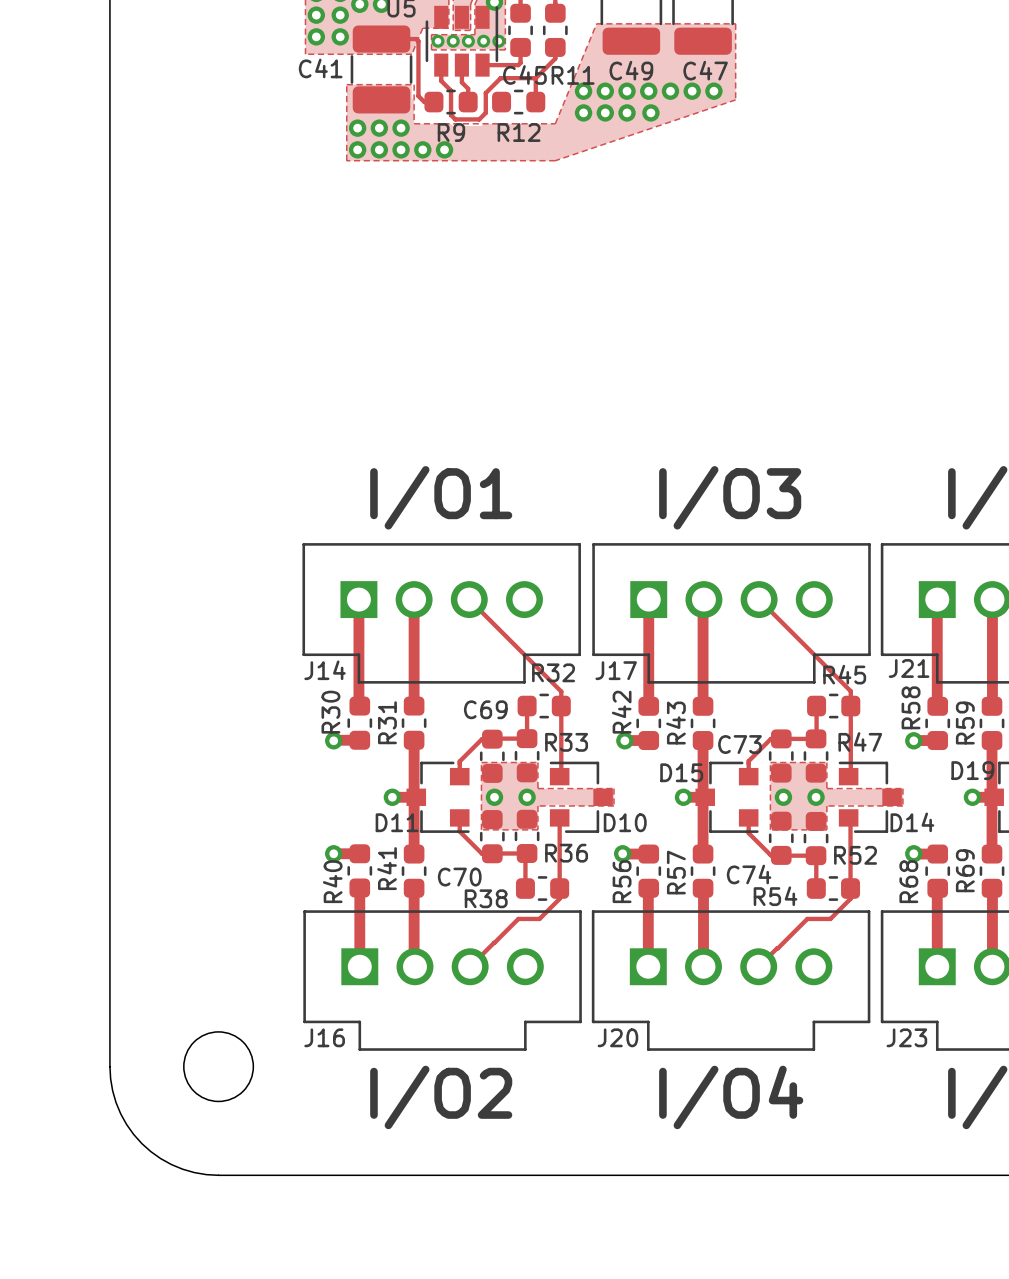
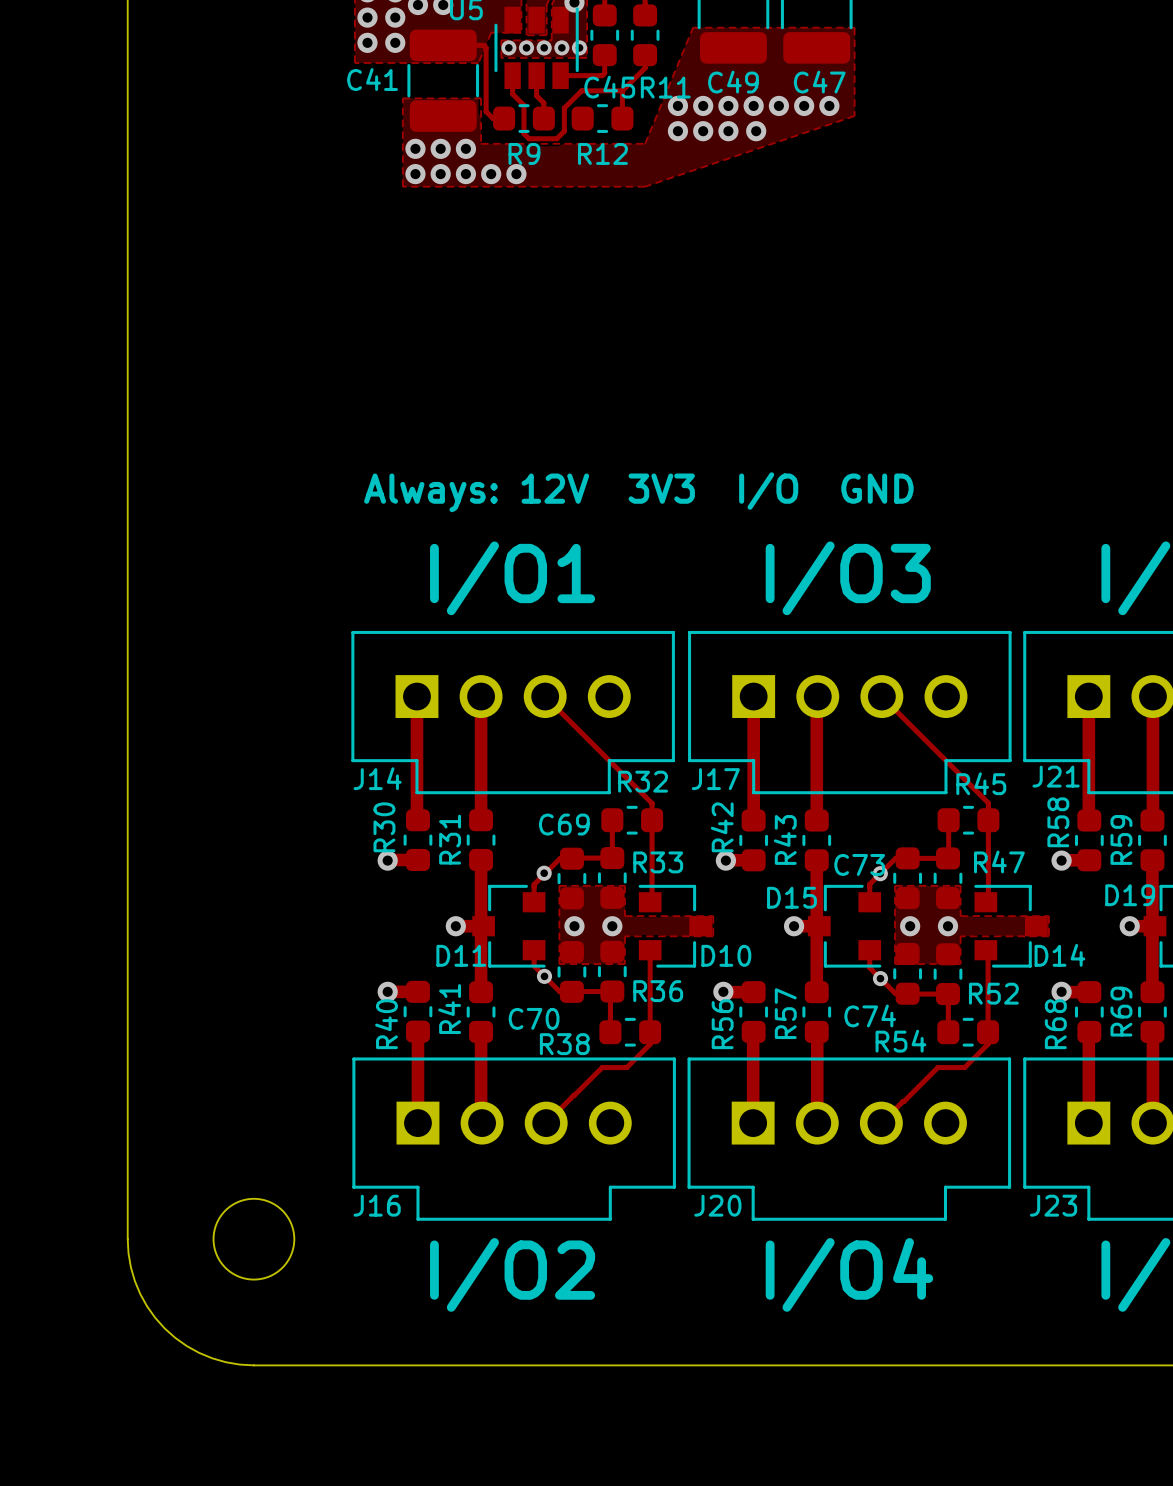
text: none -> Always: 12V 3V3 I/O GND (638, 492)
via: none -> (544, 873)
via: none -> (880, 873)
via: none -> (544, 976)
via: none -> (880, 978)

